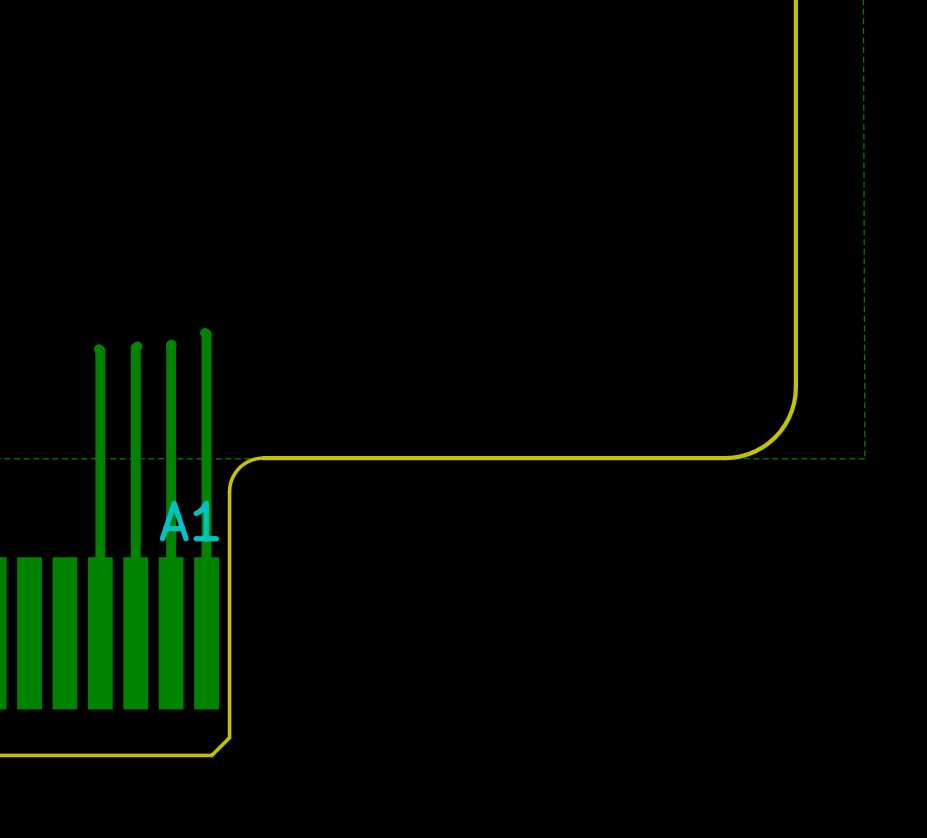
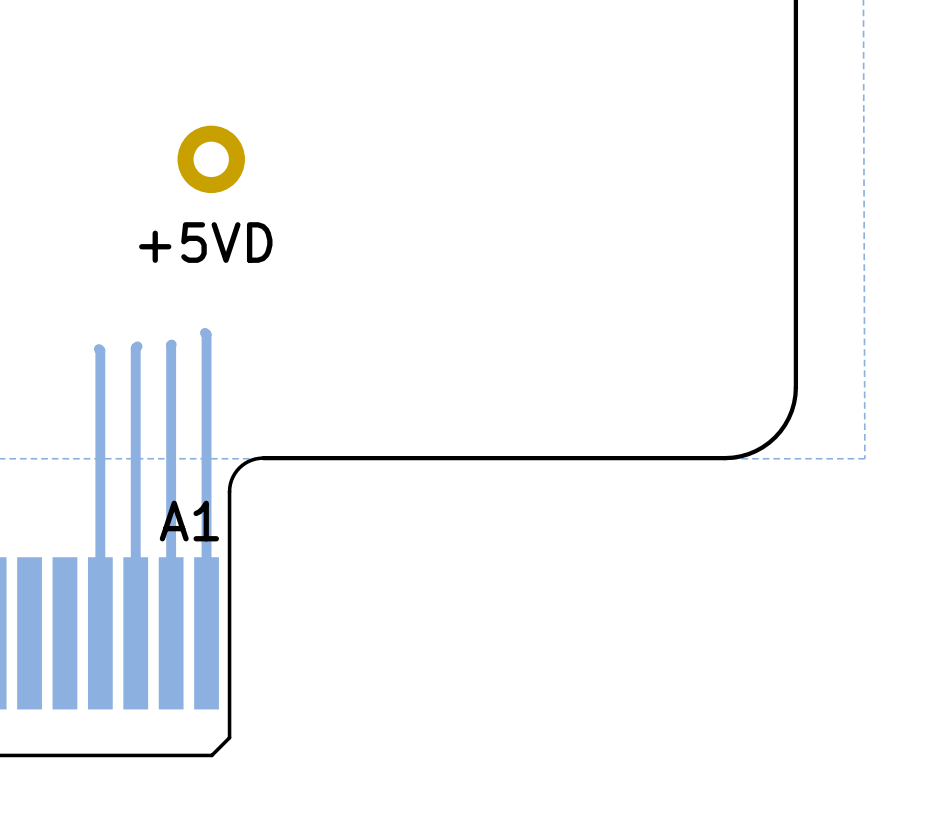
part: none -> (211, 159)
text: none -> +5VD (205, 242)

